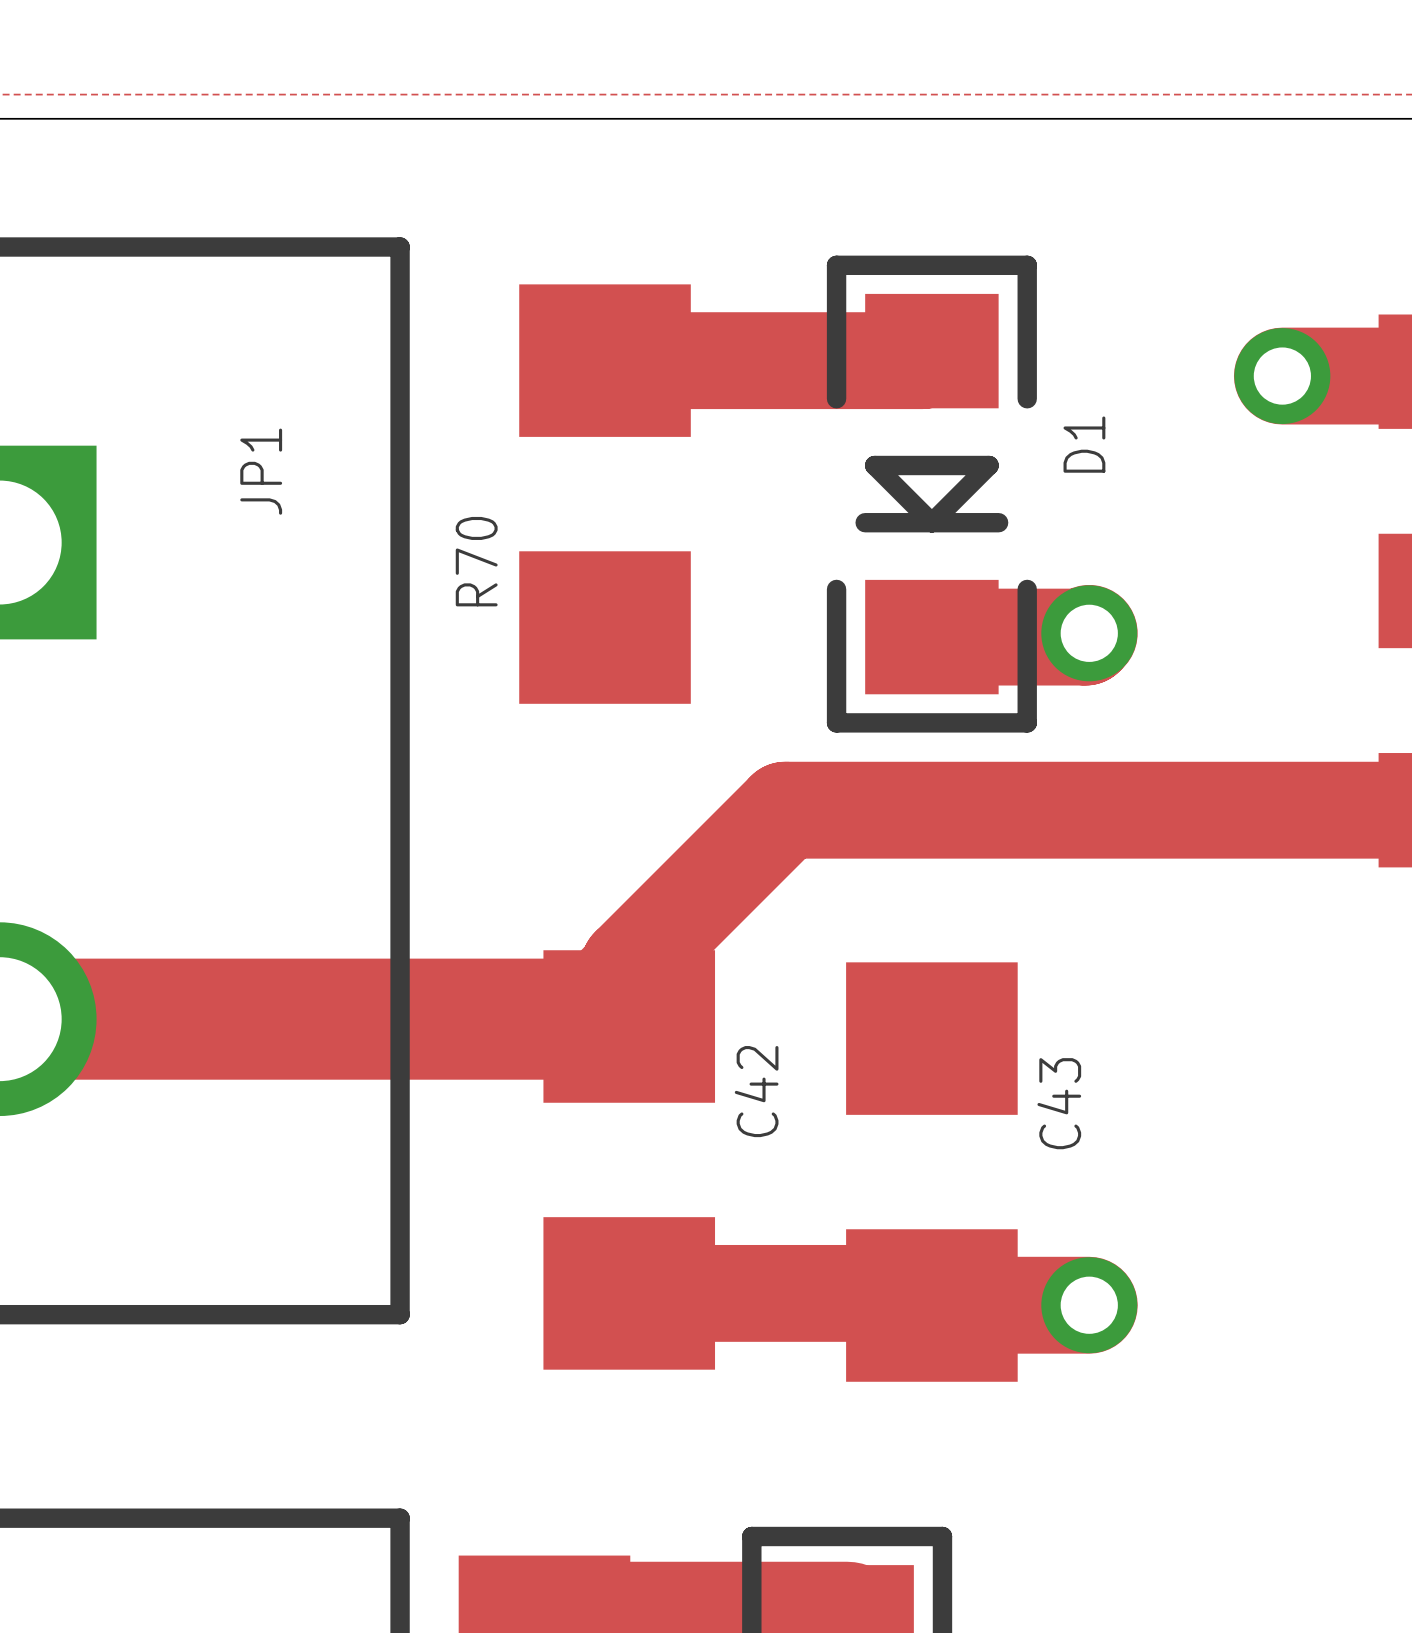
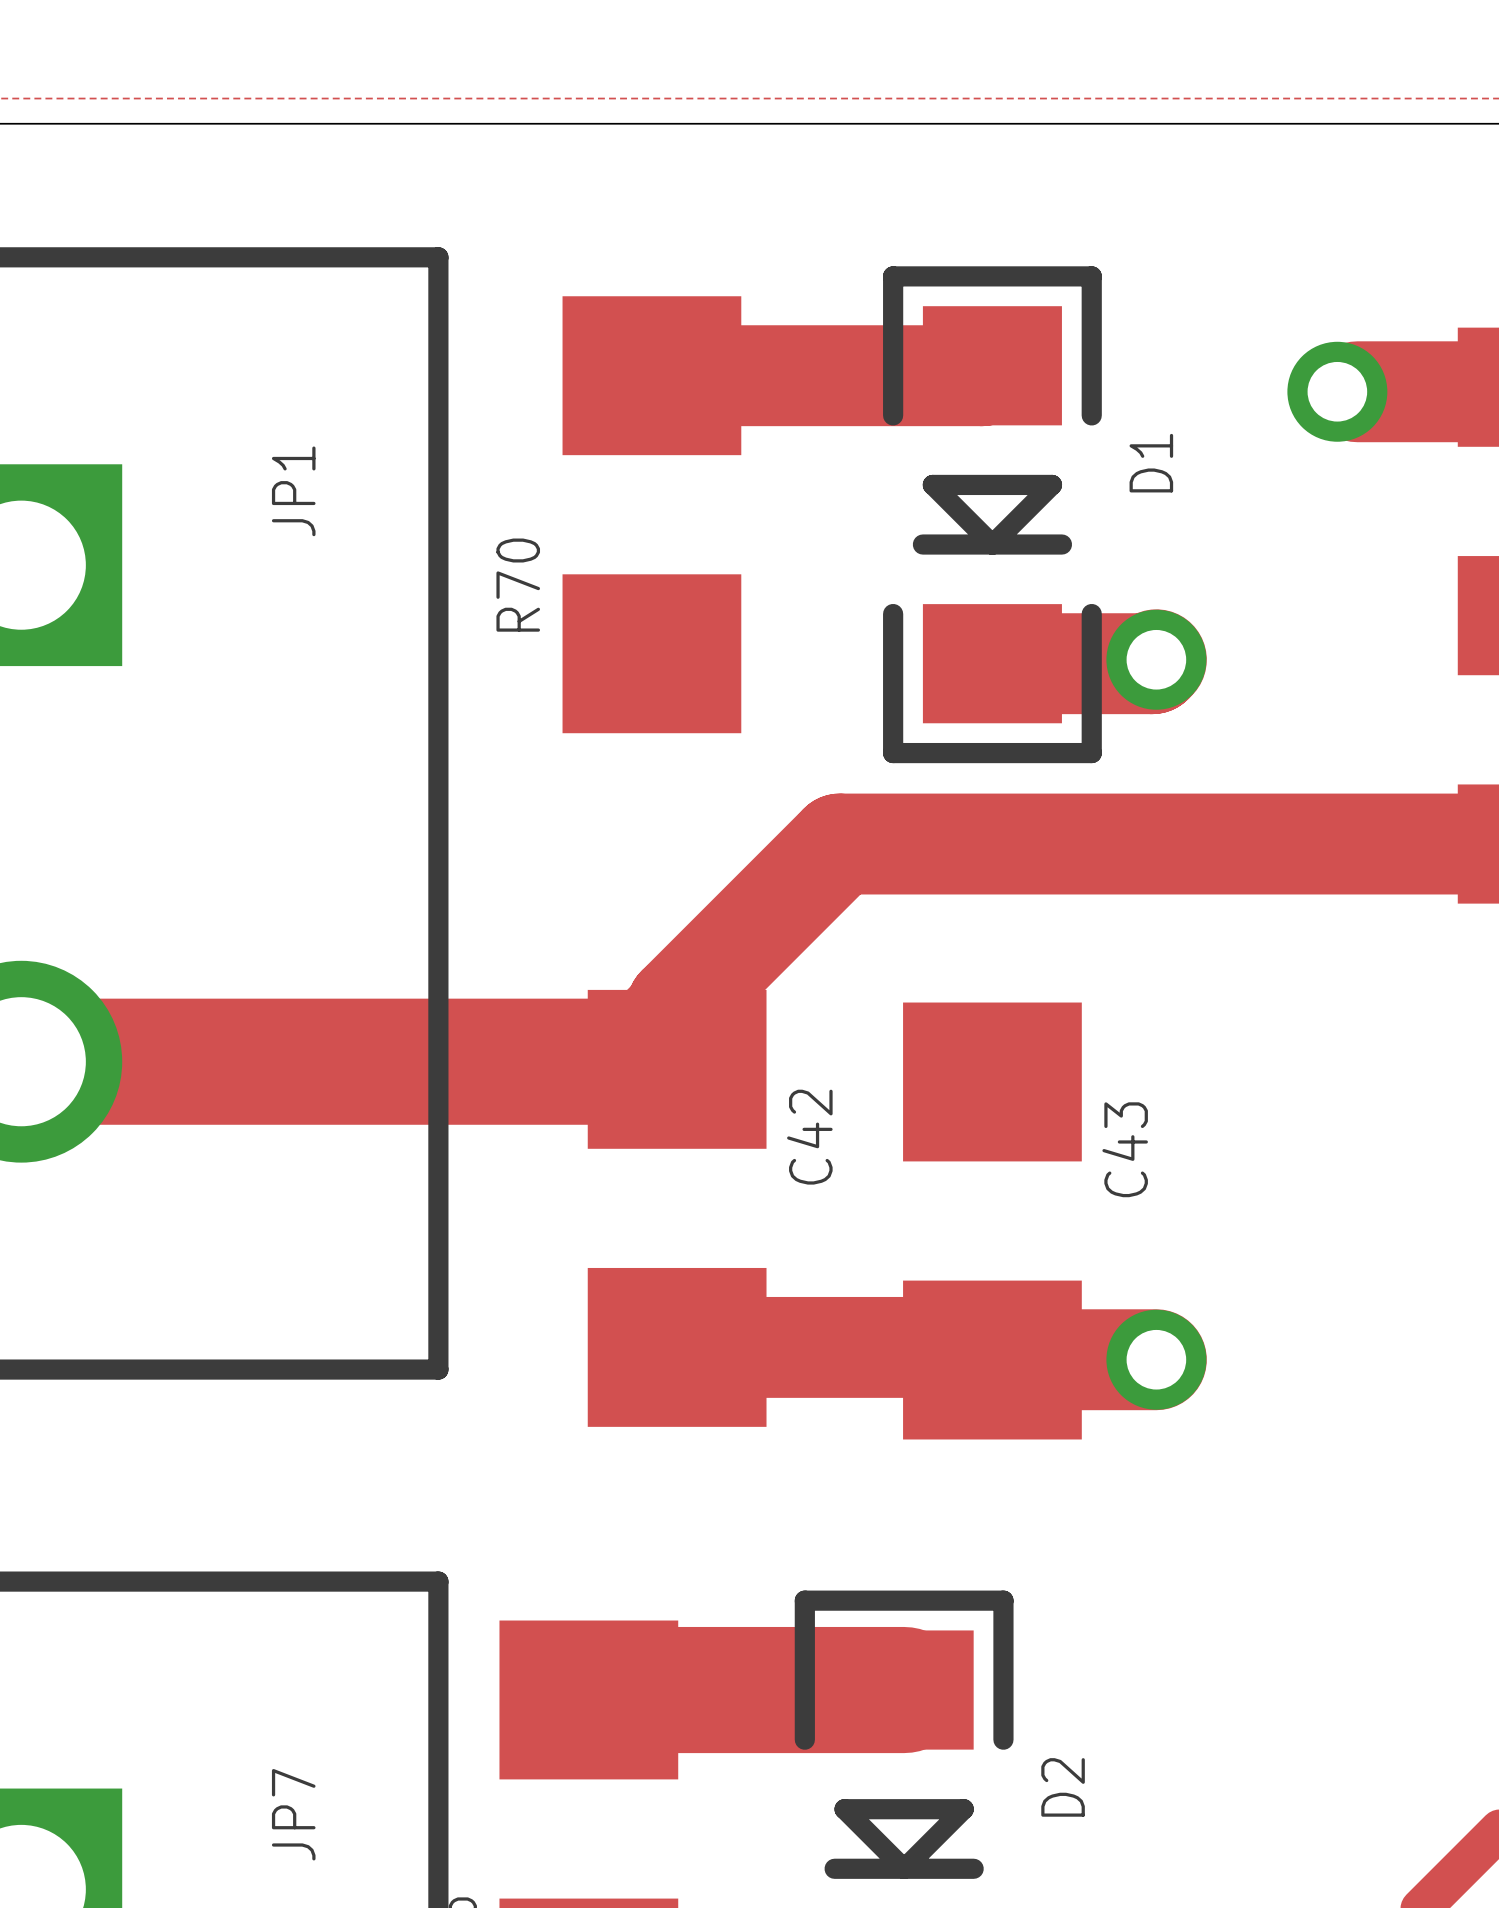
via position: (1282, 376) -> (1337, 391)

